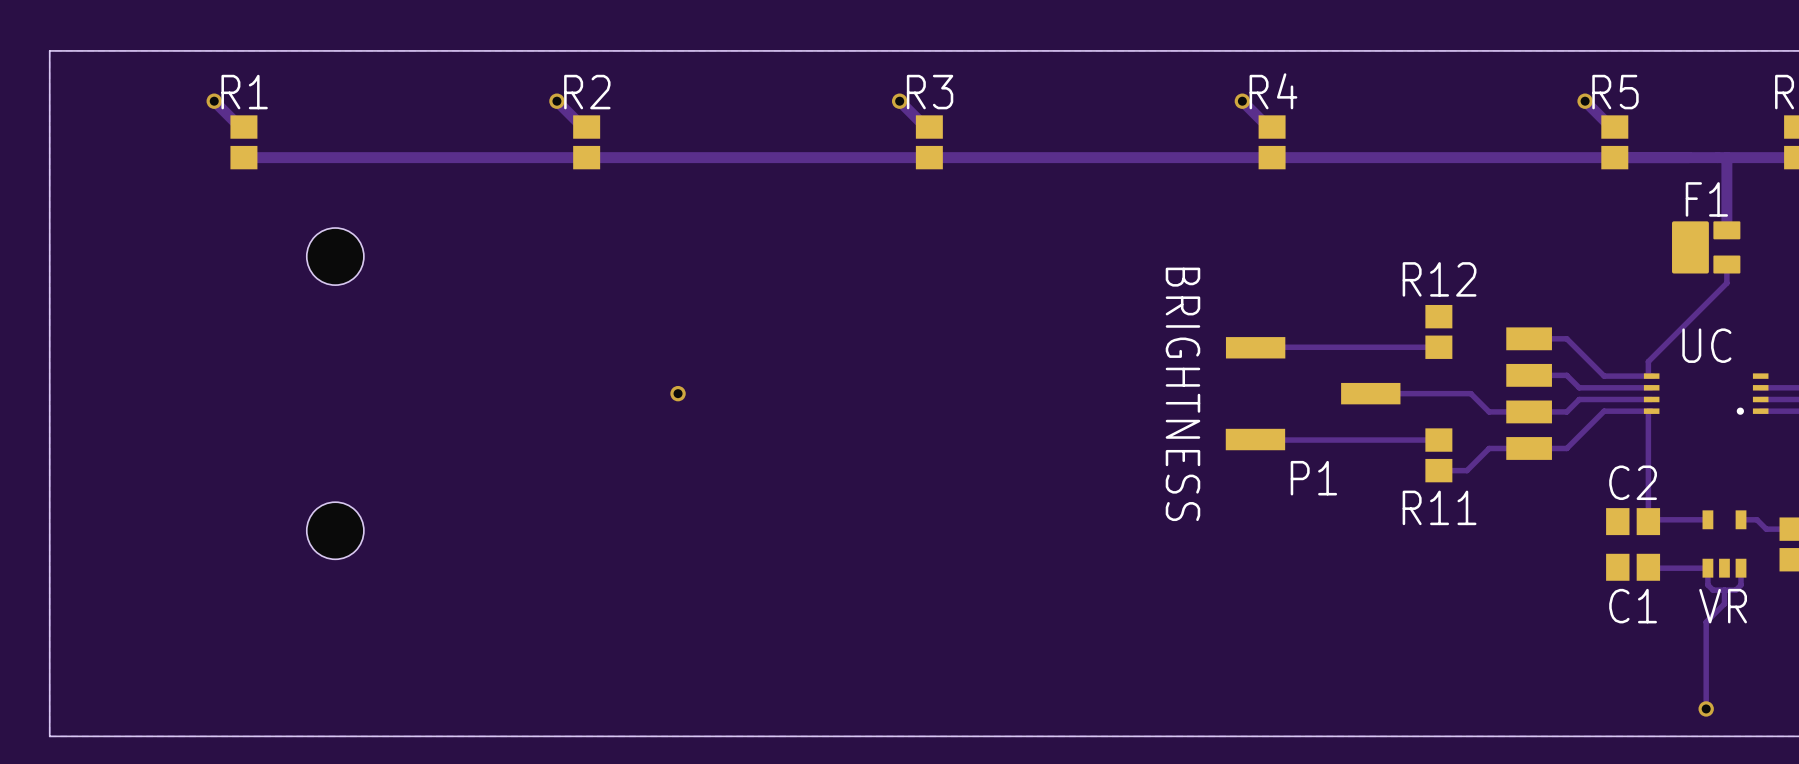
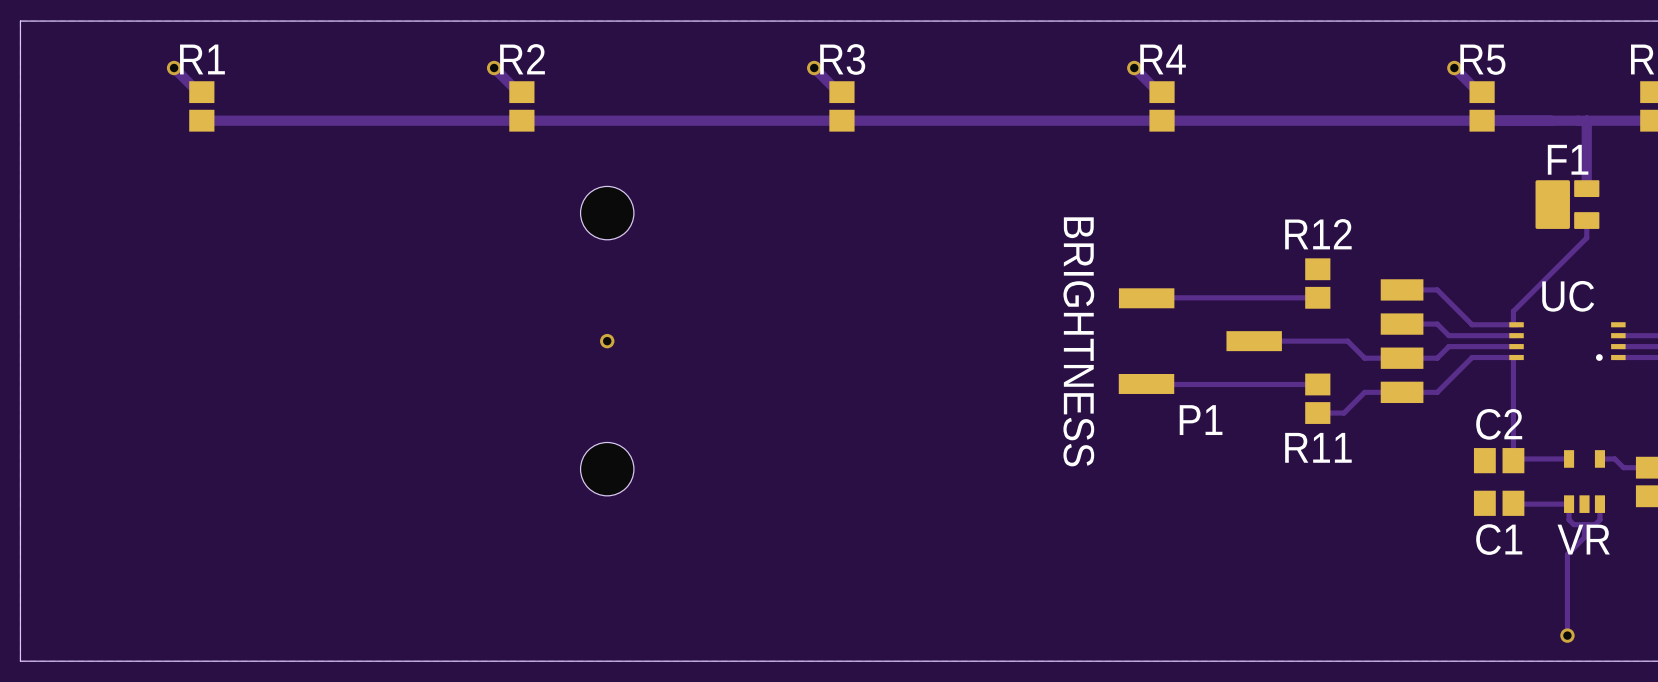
hole: (335, 256) -> none
hole: none -> (607, 213)
hole: (335, 530) -> none
hole: none -> (607, 469)

